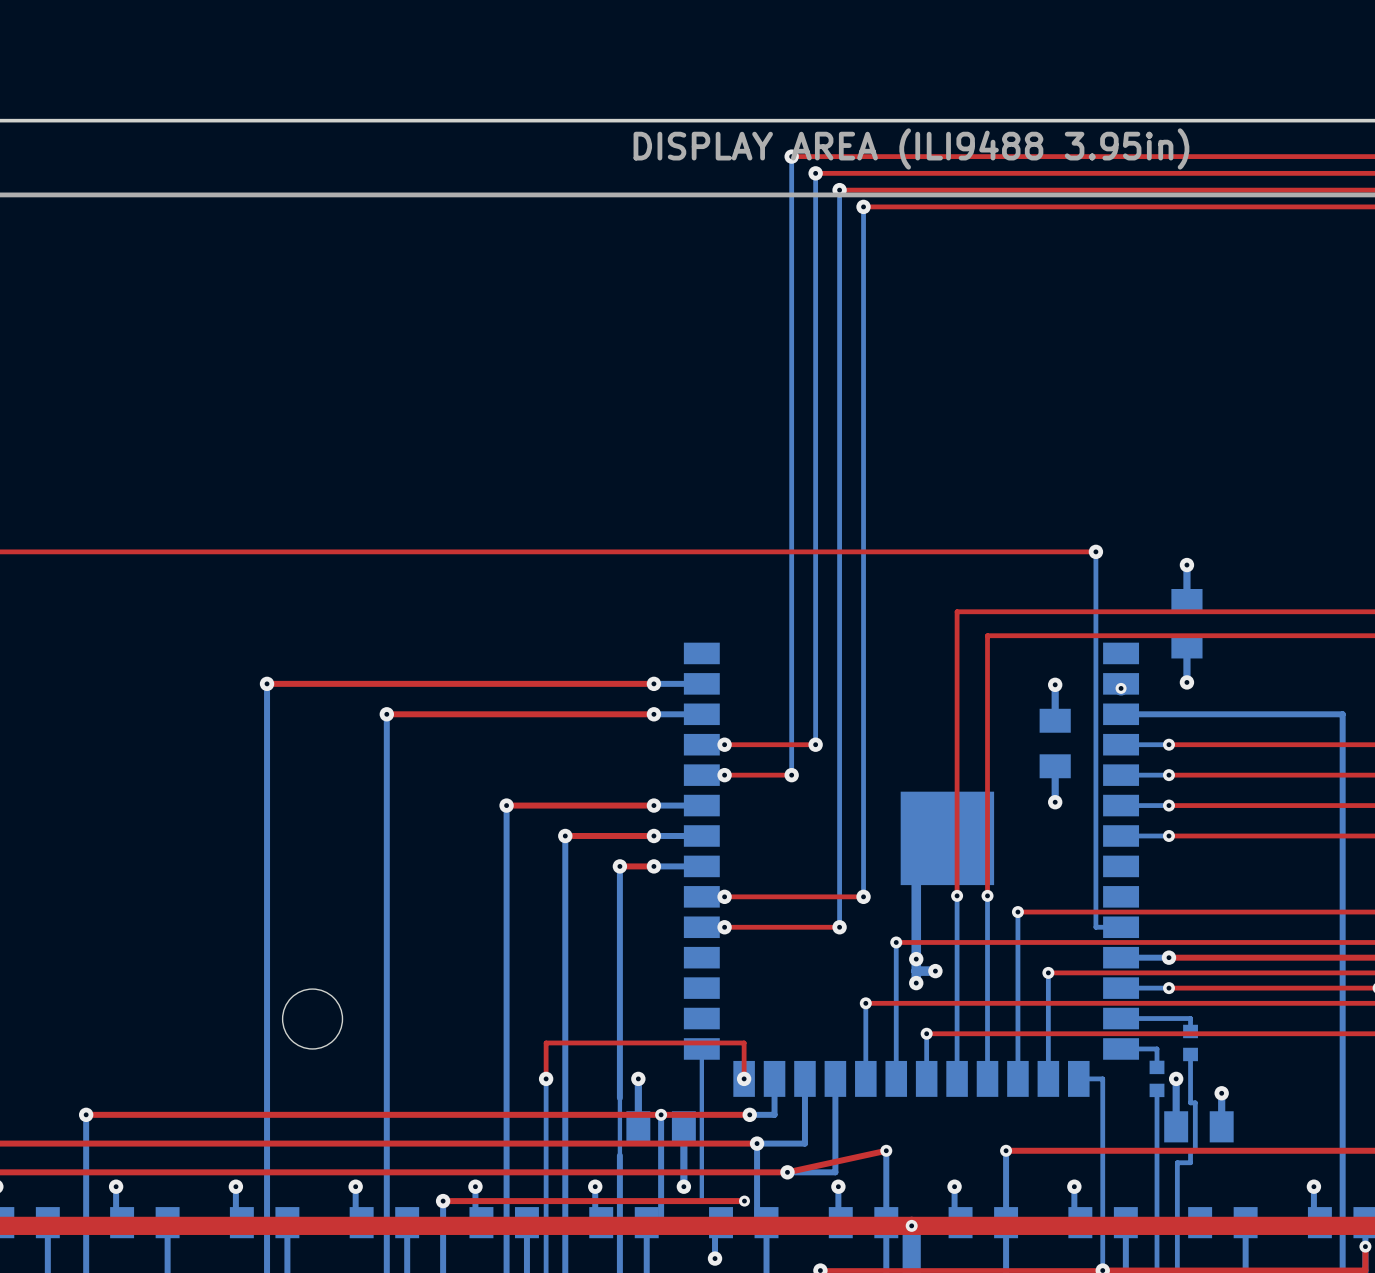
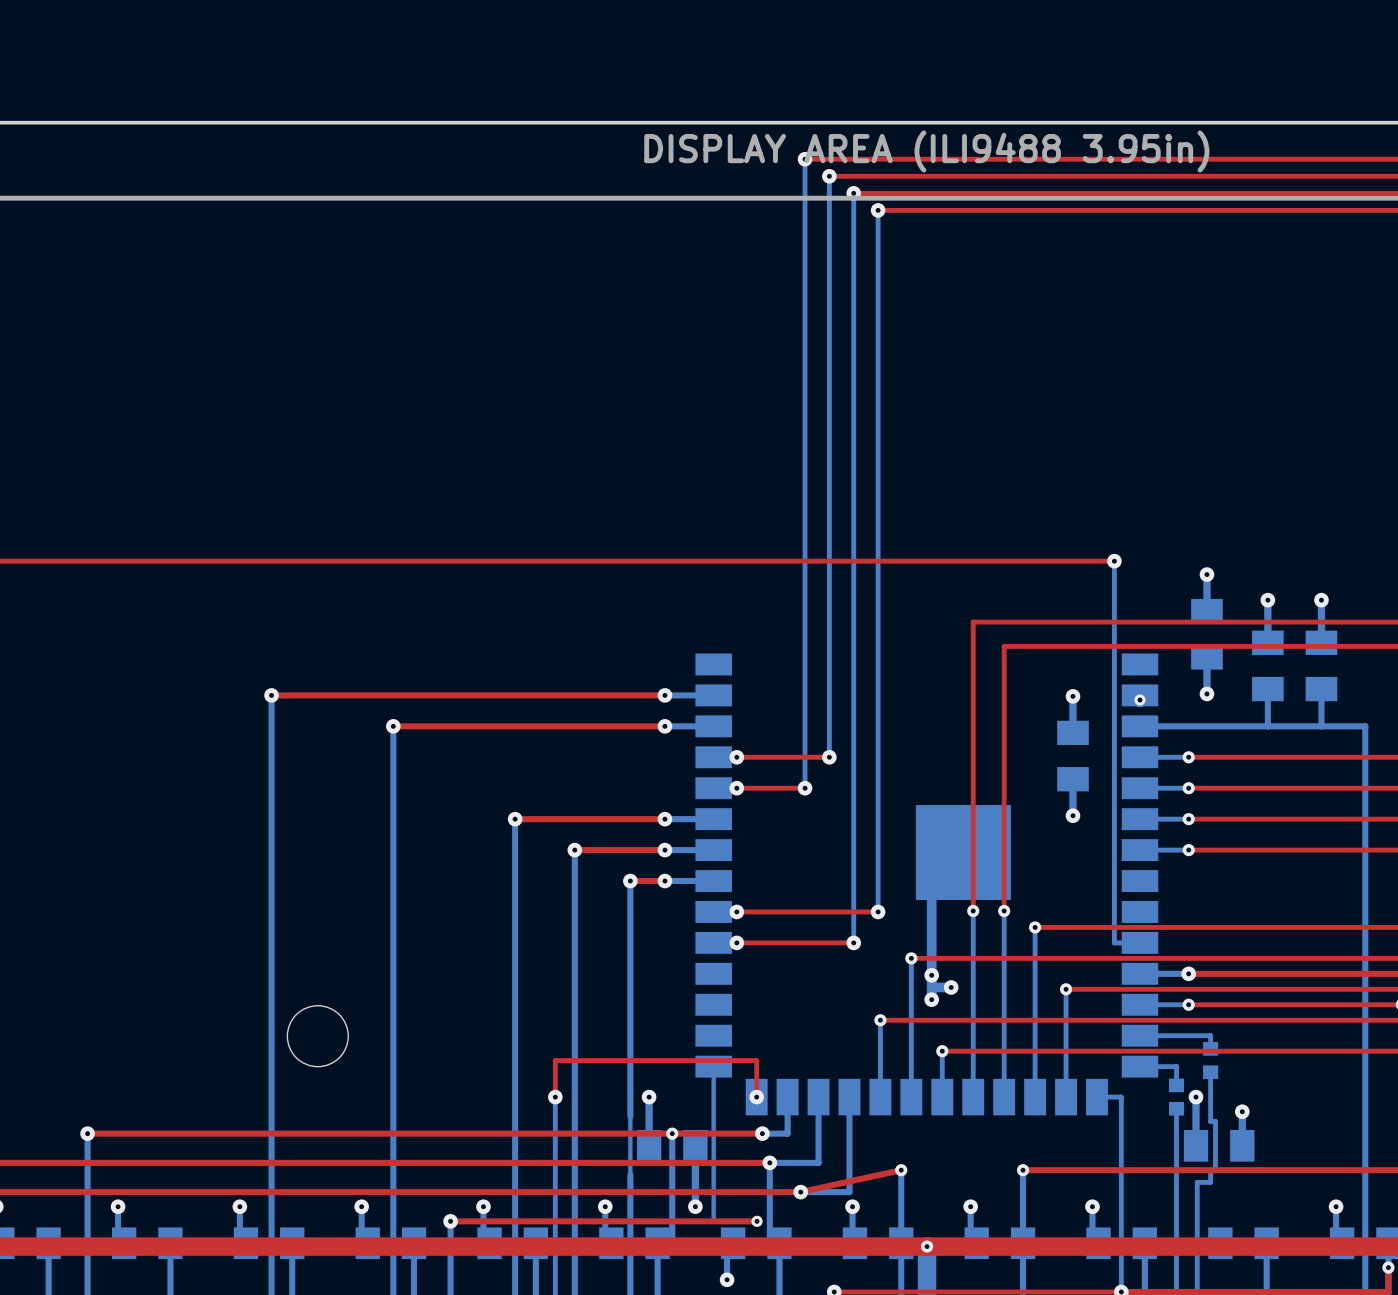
bottom track: none -> (1267, 600) (1267, 642)
via: none -> (1267, 600)
bottom track: none -> (1321, 600) (1321, 642)
via: none -> (1321, 600)
part: none -> (1267, 665)
part: none -> (1321, 665)
bottom track: none -> (1267, 689) (1267, 726)
bottom track: none -> (1321, 689) (1321, 726)

